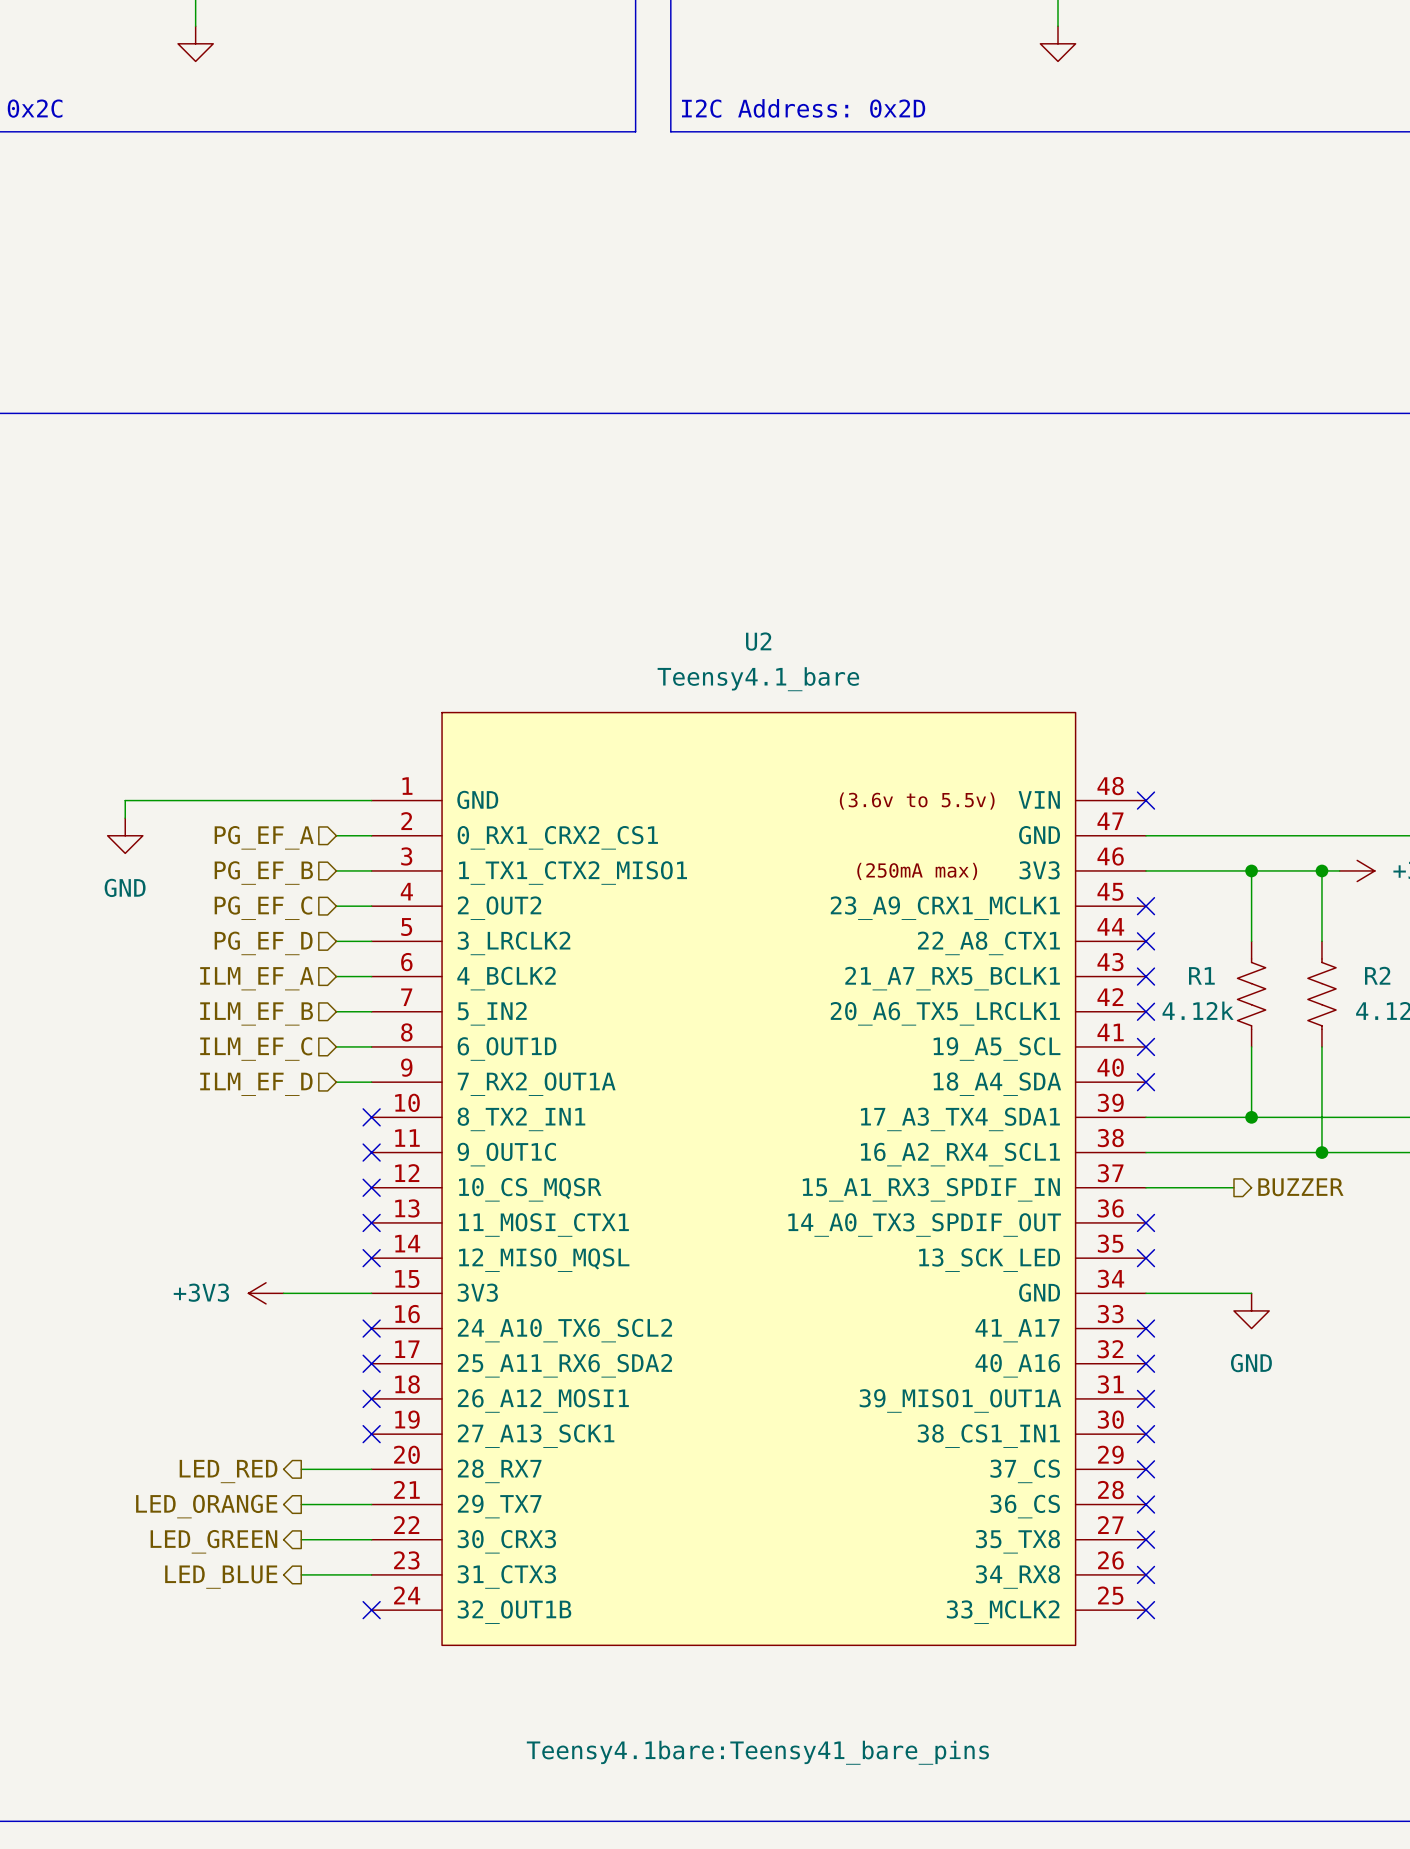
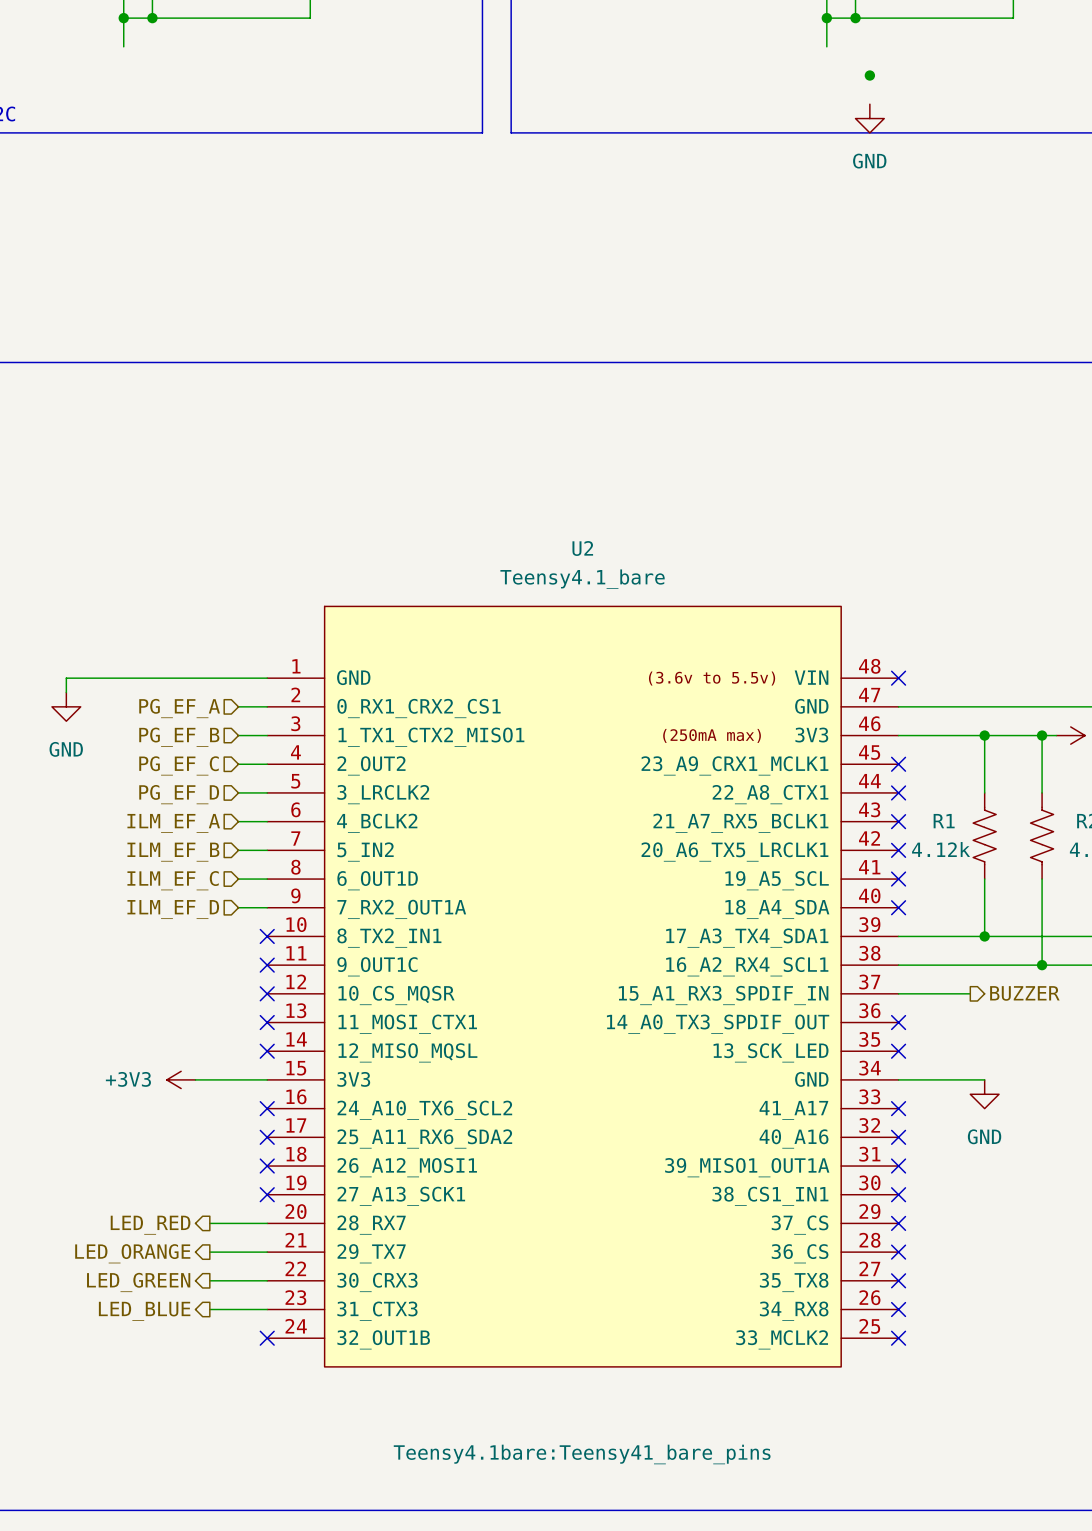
power symbol: (195, 43) -> none
power symbol: (1057, 43) -> none
junction: none -> (869, 75)
text: I2C Address: 0x2D (803, 108) -> none
power symbol: none -> GND (869, 118)

